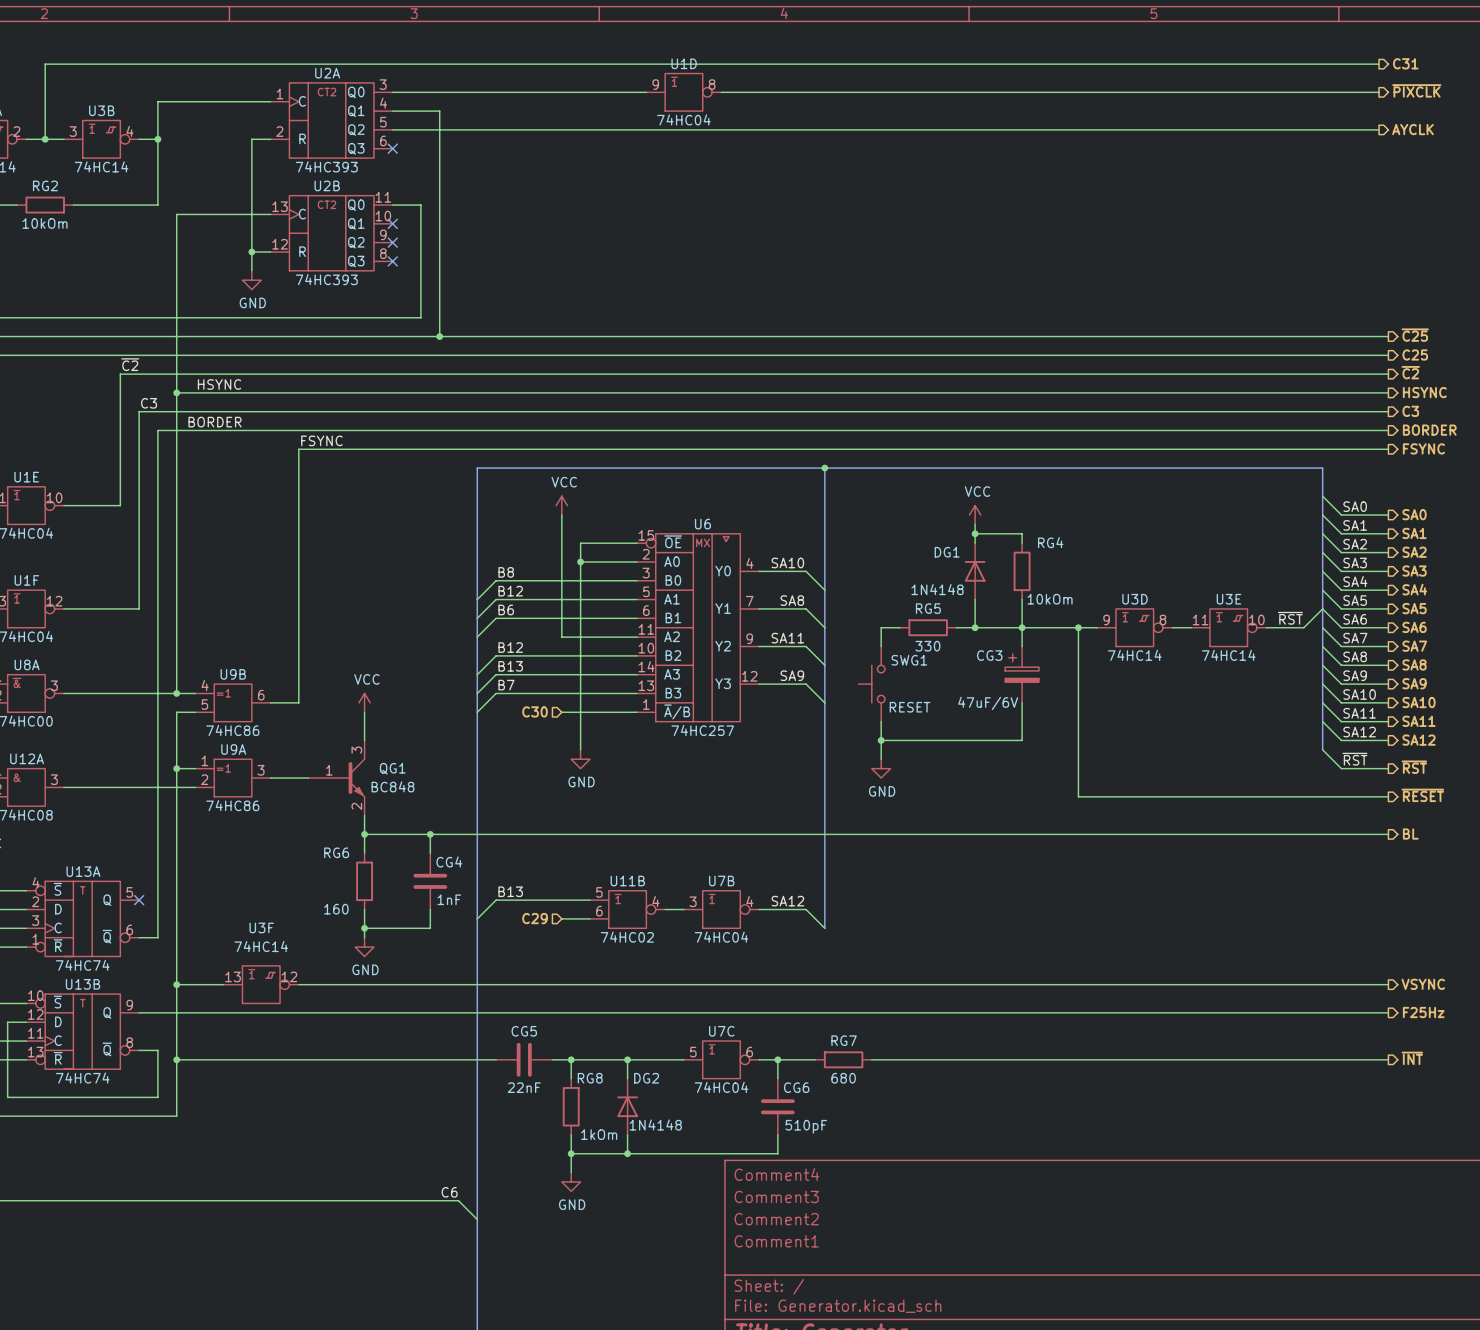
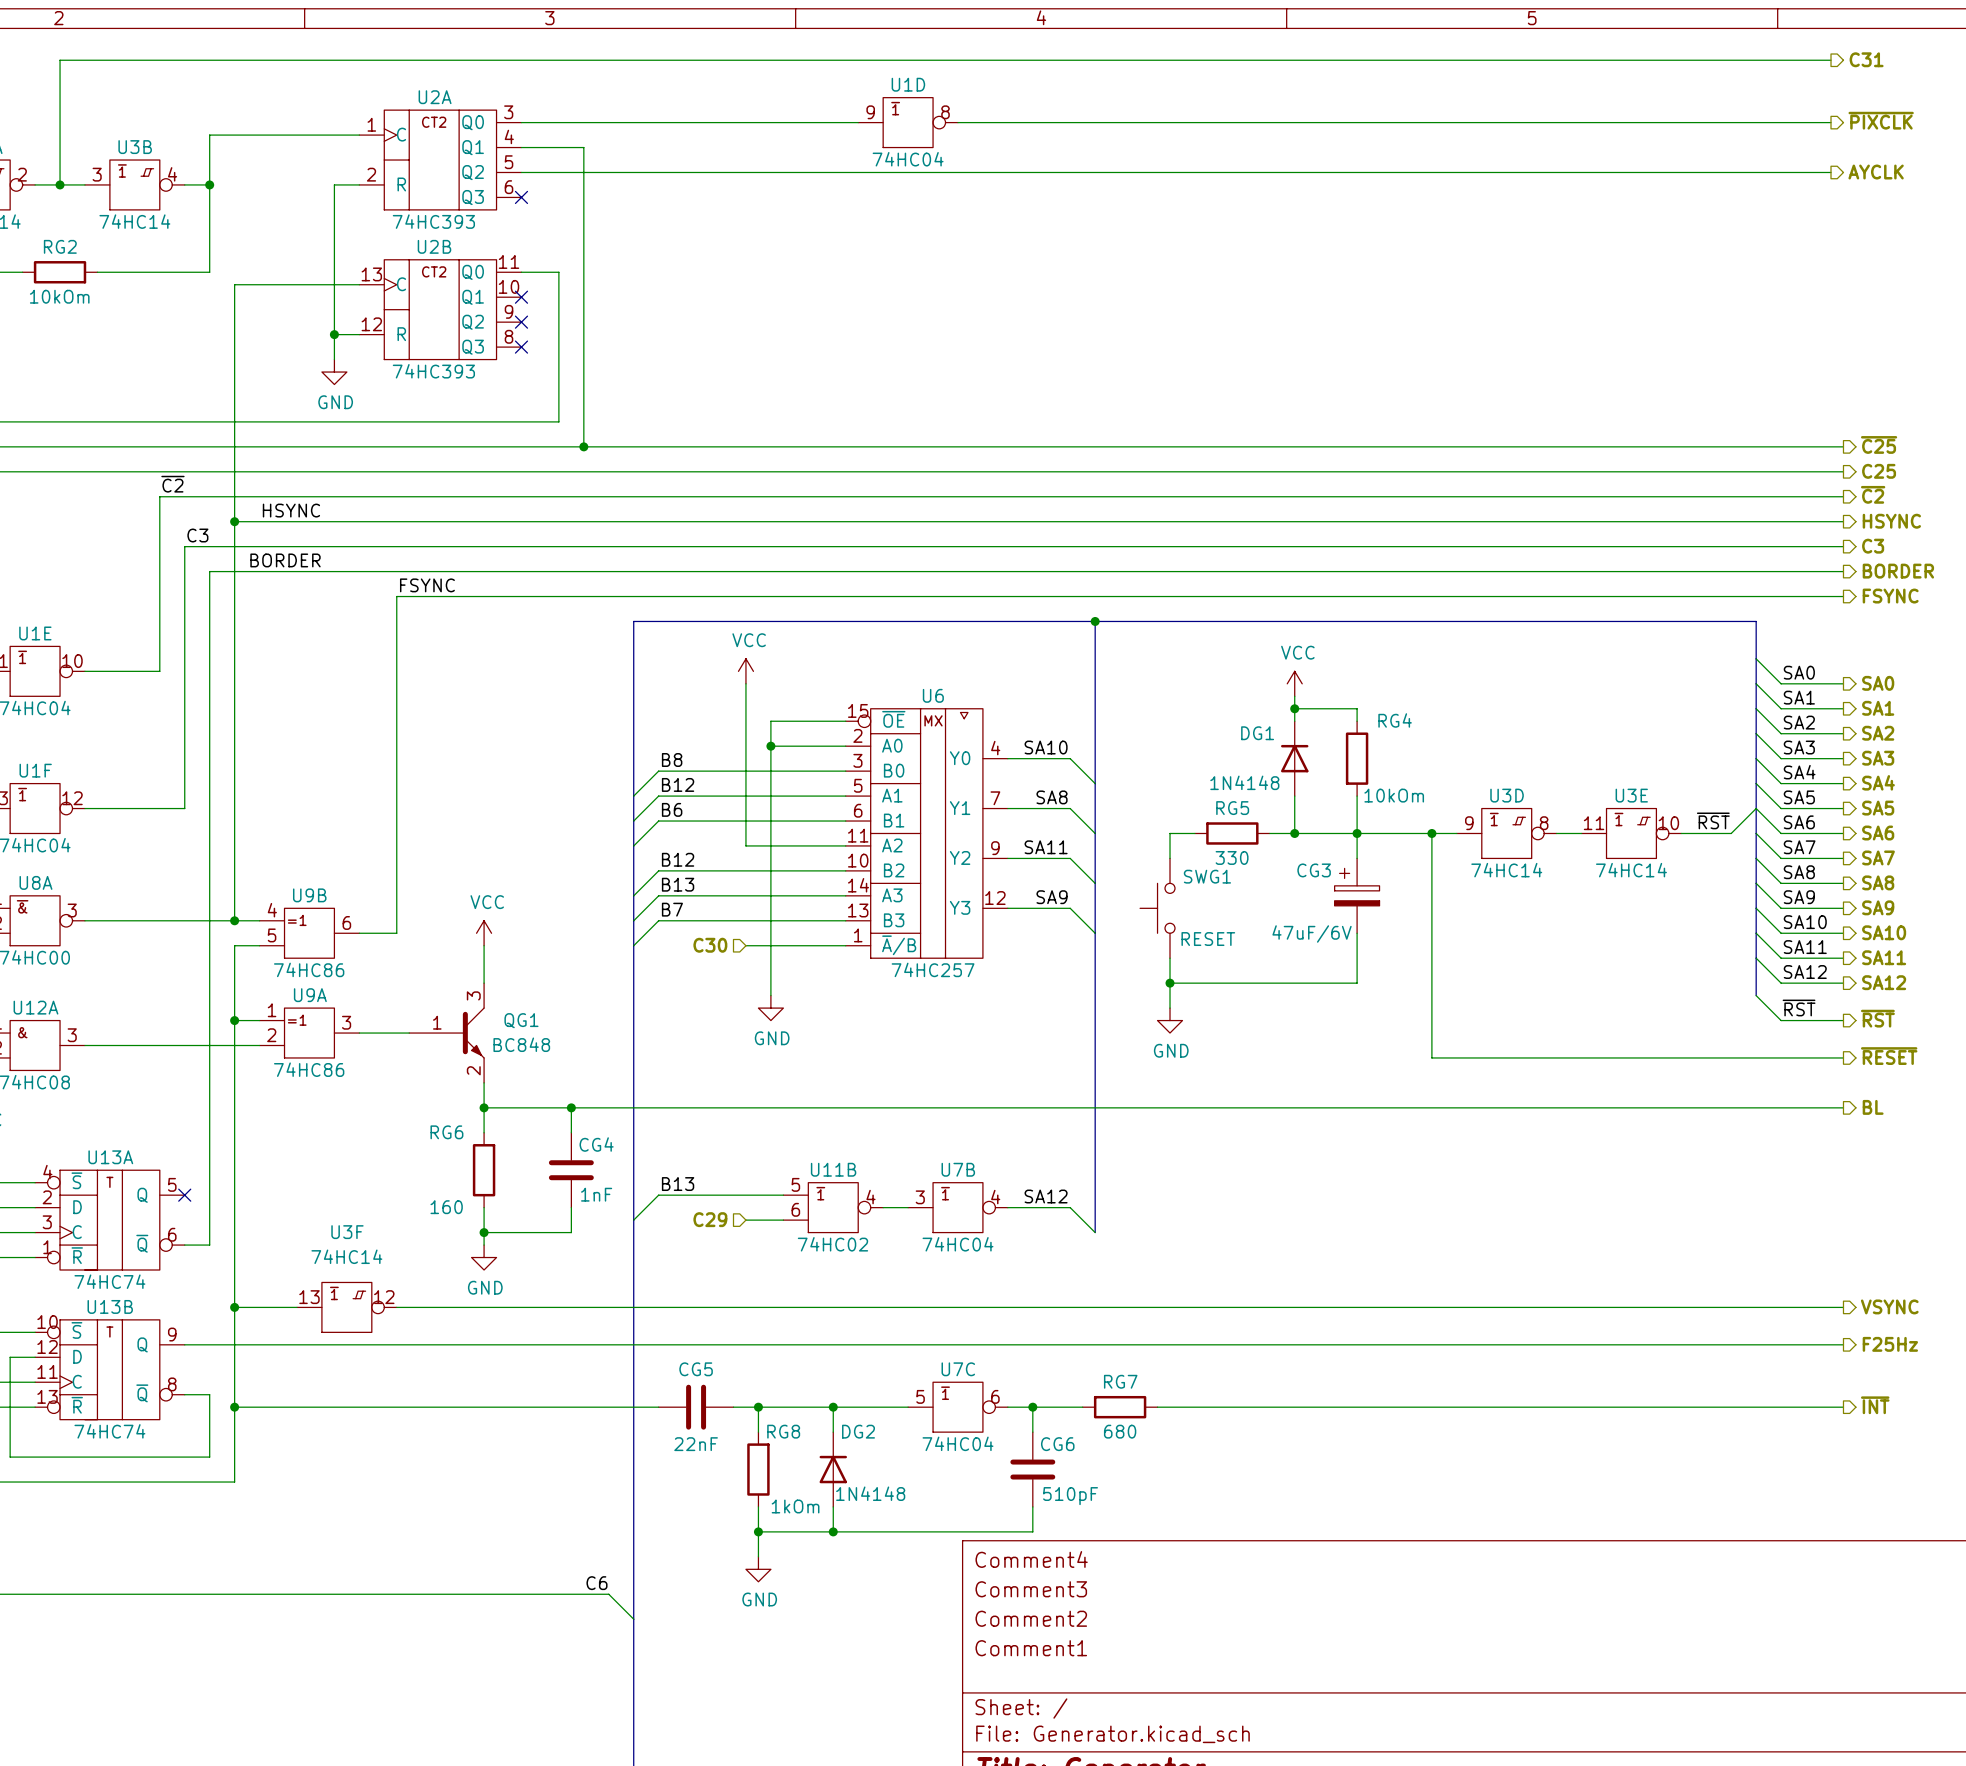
hierarchical label position: C31 (1405, 63) -> C31 (1866, 59)
wire: (45, 64) (1379, 64) -> (60, 85) (60, 60) (1831, 60)

